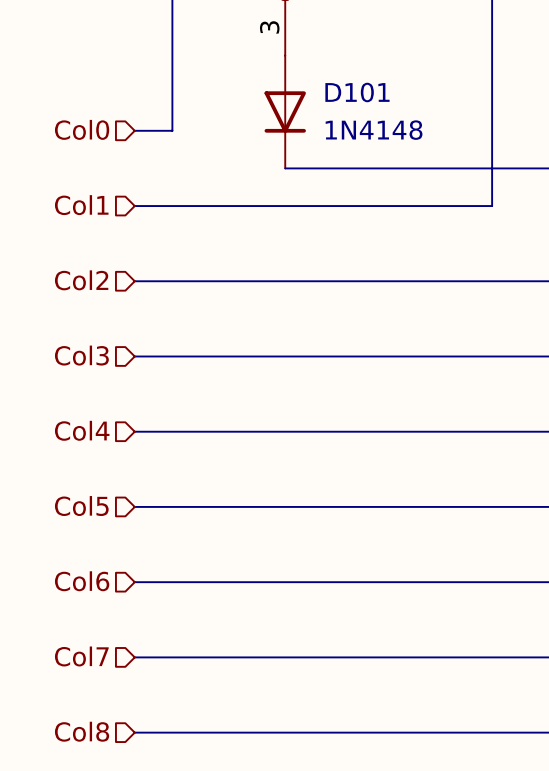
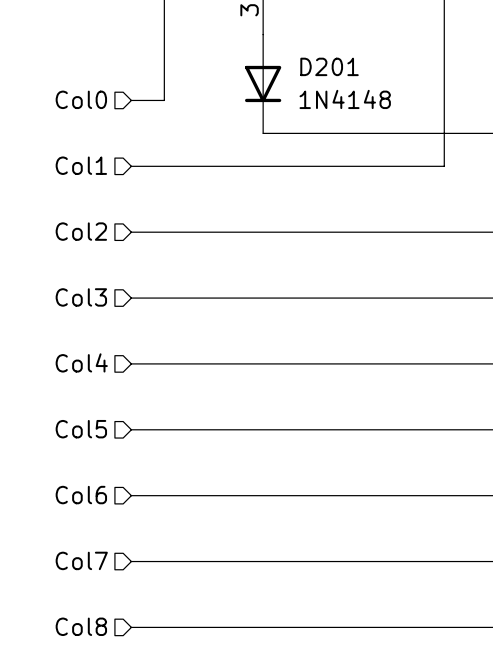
D101 name: D101 (357, 92) -> D201 (329, 66)

